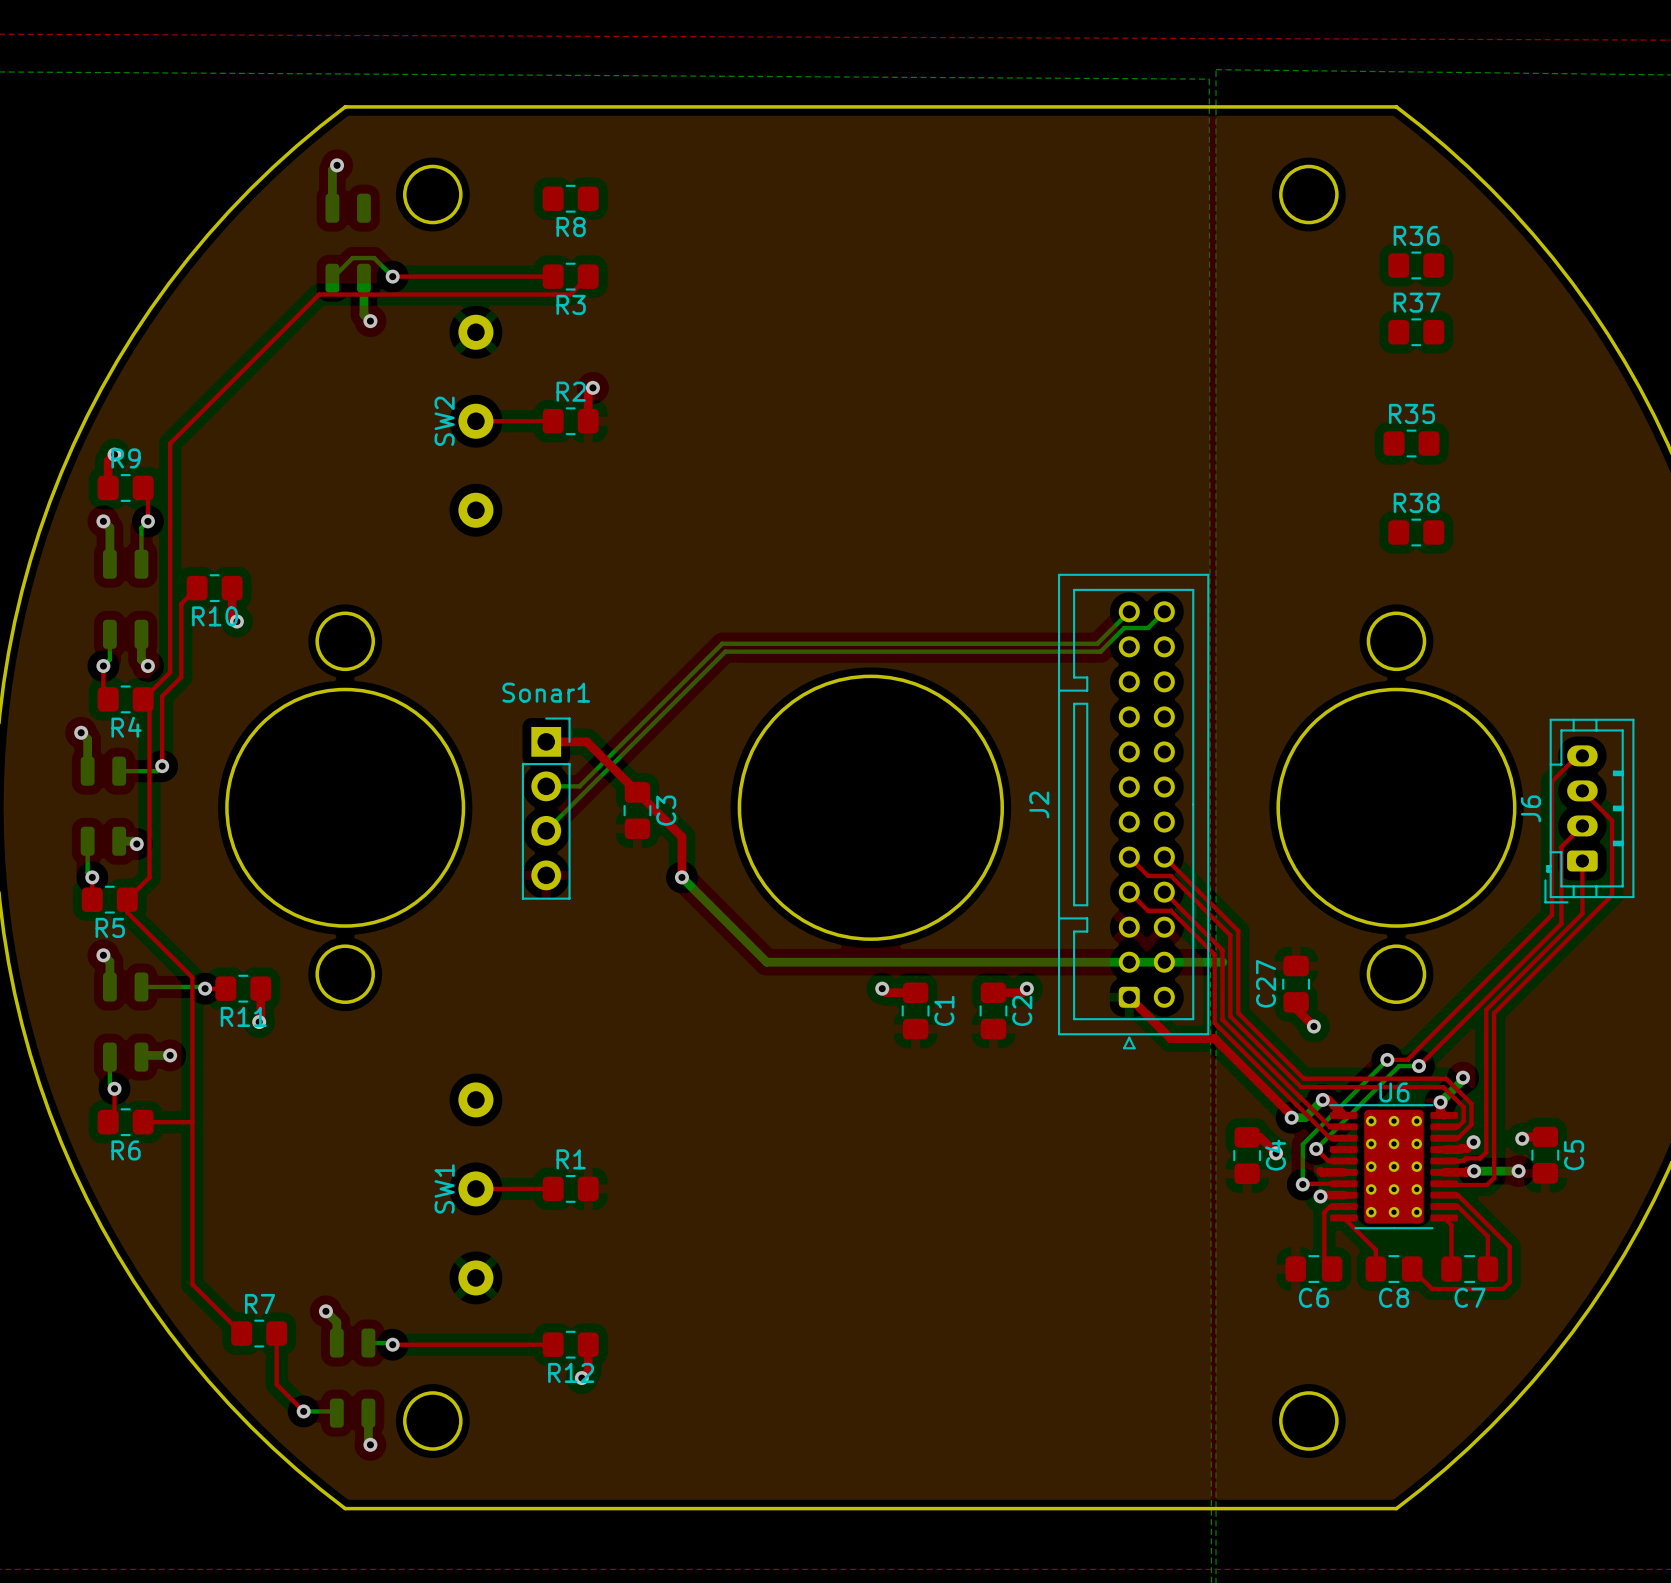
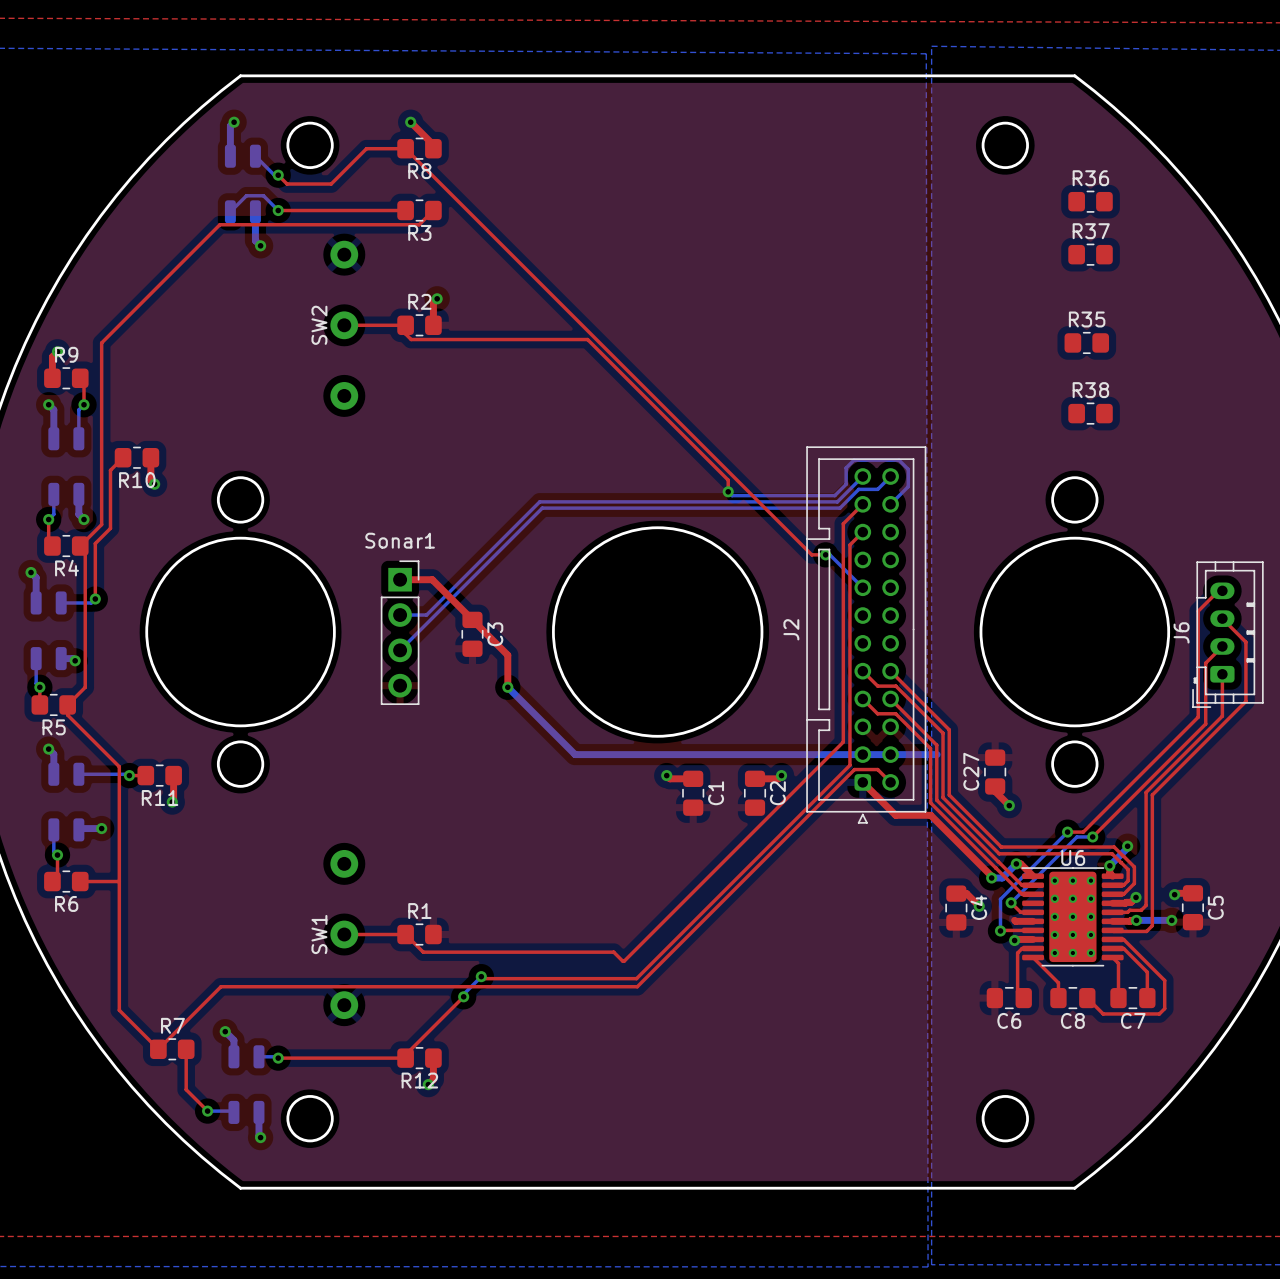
top track: none -> (410, 122) (433, 144) (433, 148)
via: none -> (410, 122)
bottom track: none -> (255, 156) (274, 175) (278, 175)
top track: none -> (278, 175) (287, 184) (331, 184) (366, 148) (405, 148) (811, 554) (825, 554)
via: none -> (278, 175)
top track: none -> (405, 325) (405, 333) (411, 339) (587, 339) (728, 480) (728, 491)
bottom track: none -> (728, 491) (732, 495) (834, 495) (846, 484) (846, 467) (853, 460) (899, 460) (908, 469) (908, 486) (890, 504)
via: none -> (728, 491)
top track: none -> (862, 504) (843, 523) (843, 742) (624, 961) (613, 952) (423, 952) (405, 934)
top track: none -> (862, 532) (849, 544) (849, 765) (636, 978) (483, 978) (481, 976)
bottom track: none -> (825, 554) (829, 554) (862, 587)
via: none -> (825, 554)
top track: none -> (890, 782) (877, 769) (854, 769) (637, 986) (220, 986) (158, 1049)
bottom track: none -> (481, 976) (463, 994) (463, 996)
via: none -> (481, 976)
top track: none -> (463, 996) (405, 1054) (405, 1058)
via: none -> (463, 996)

